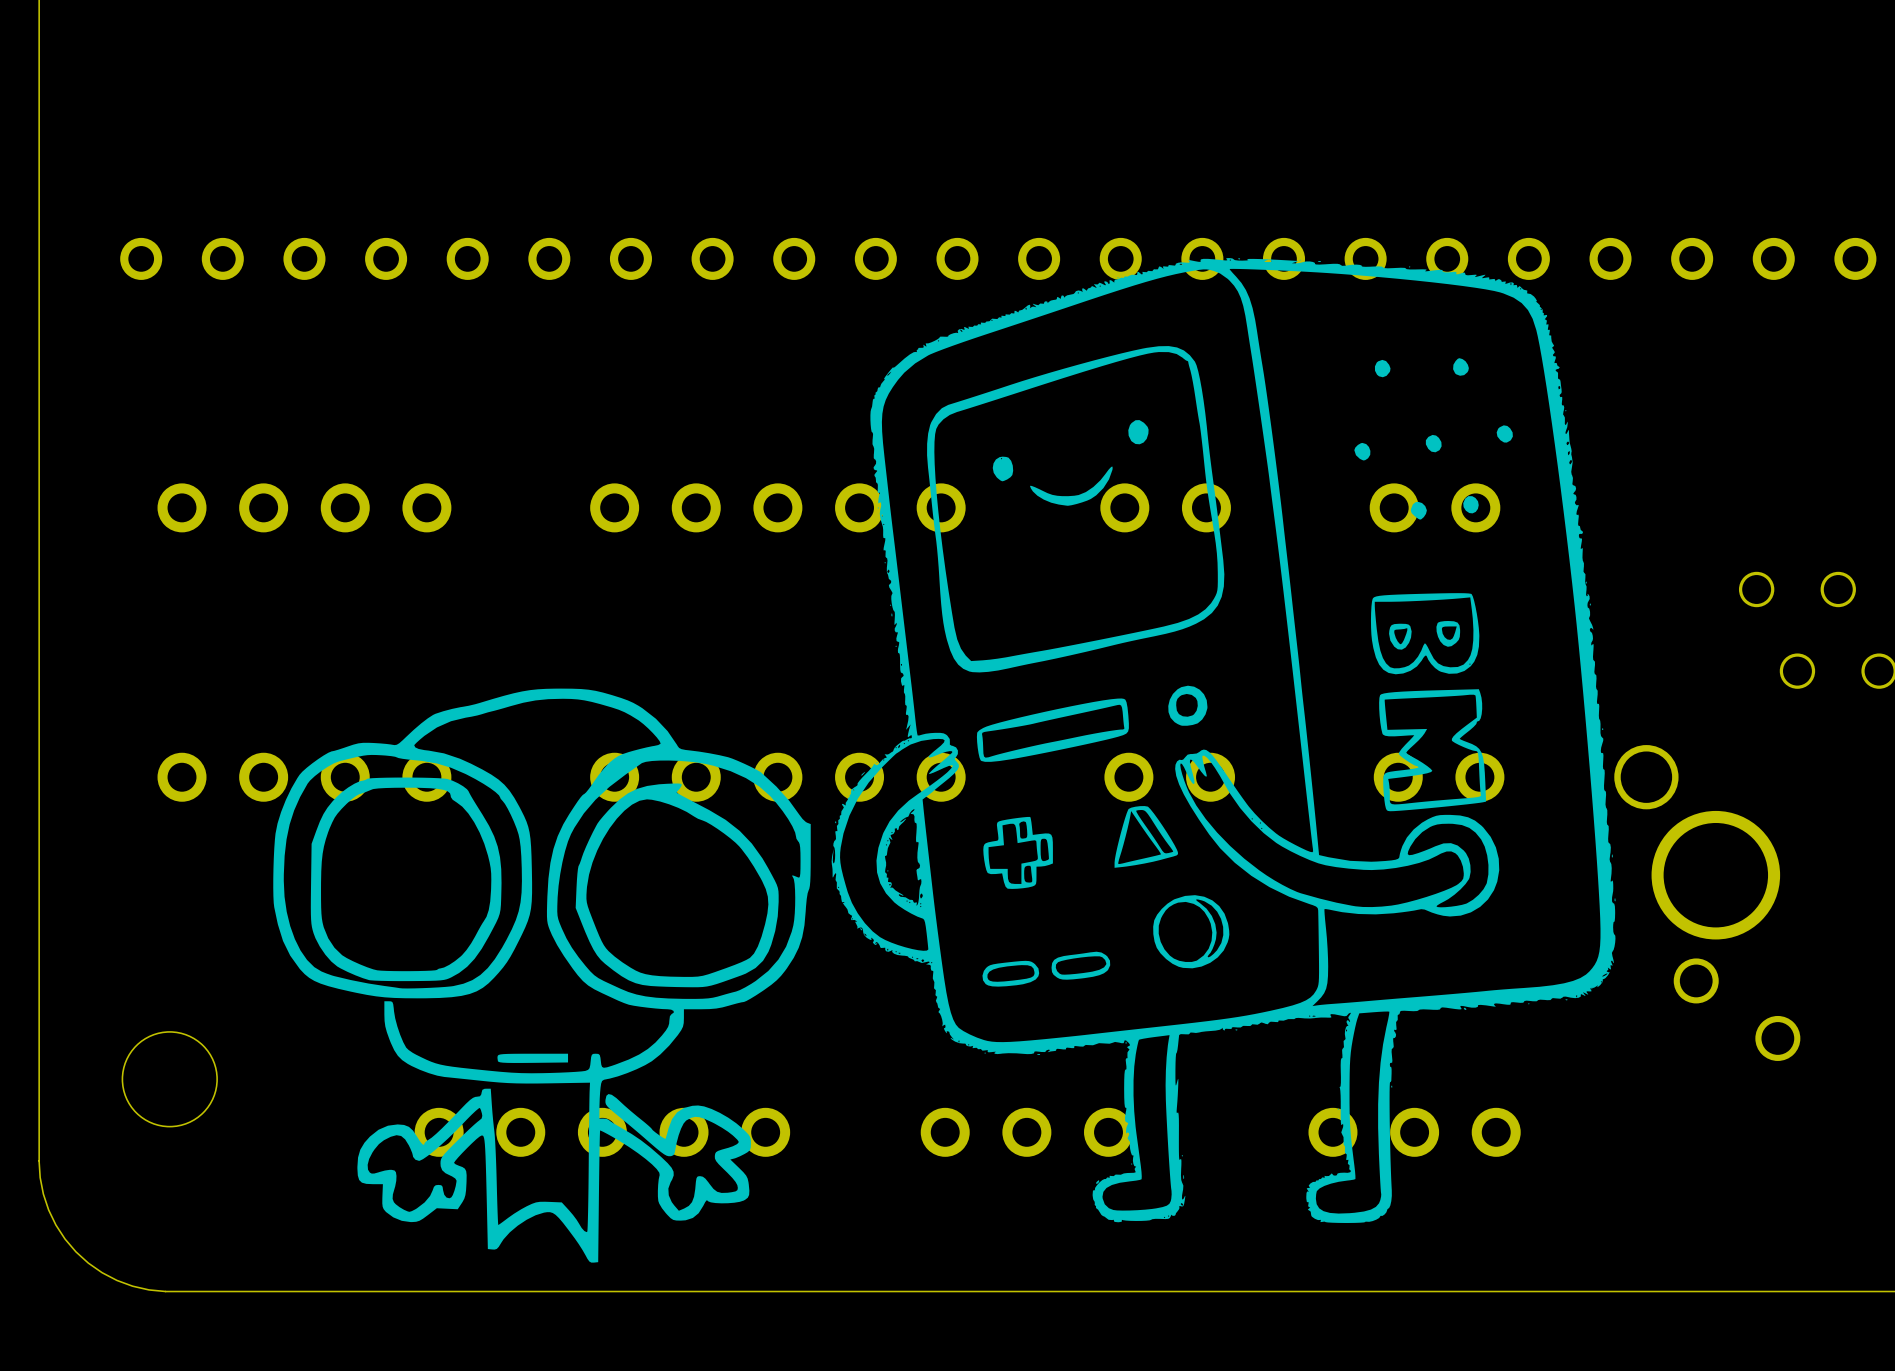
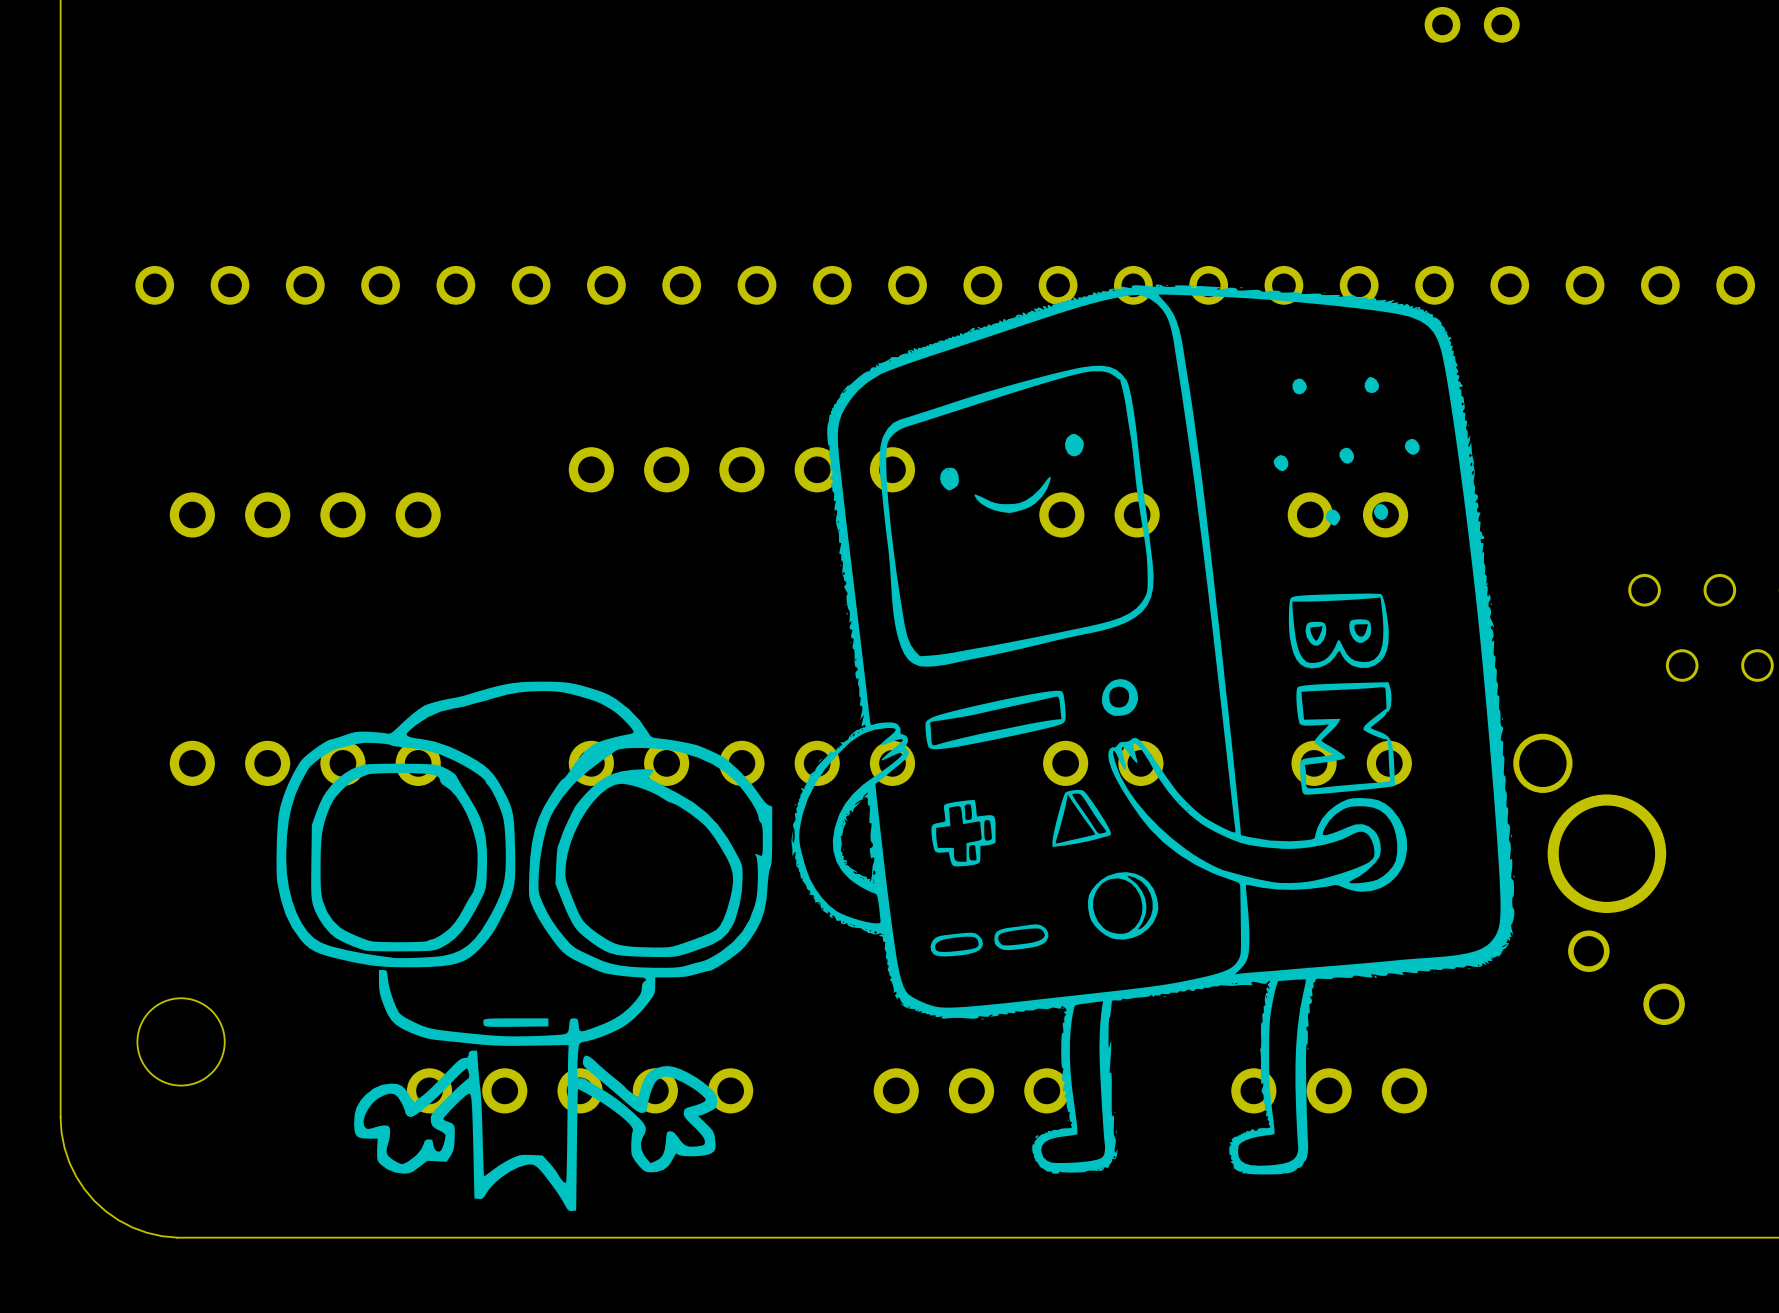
part position: (777, 507) -> (741, 469)

